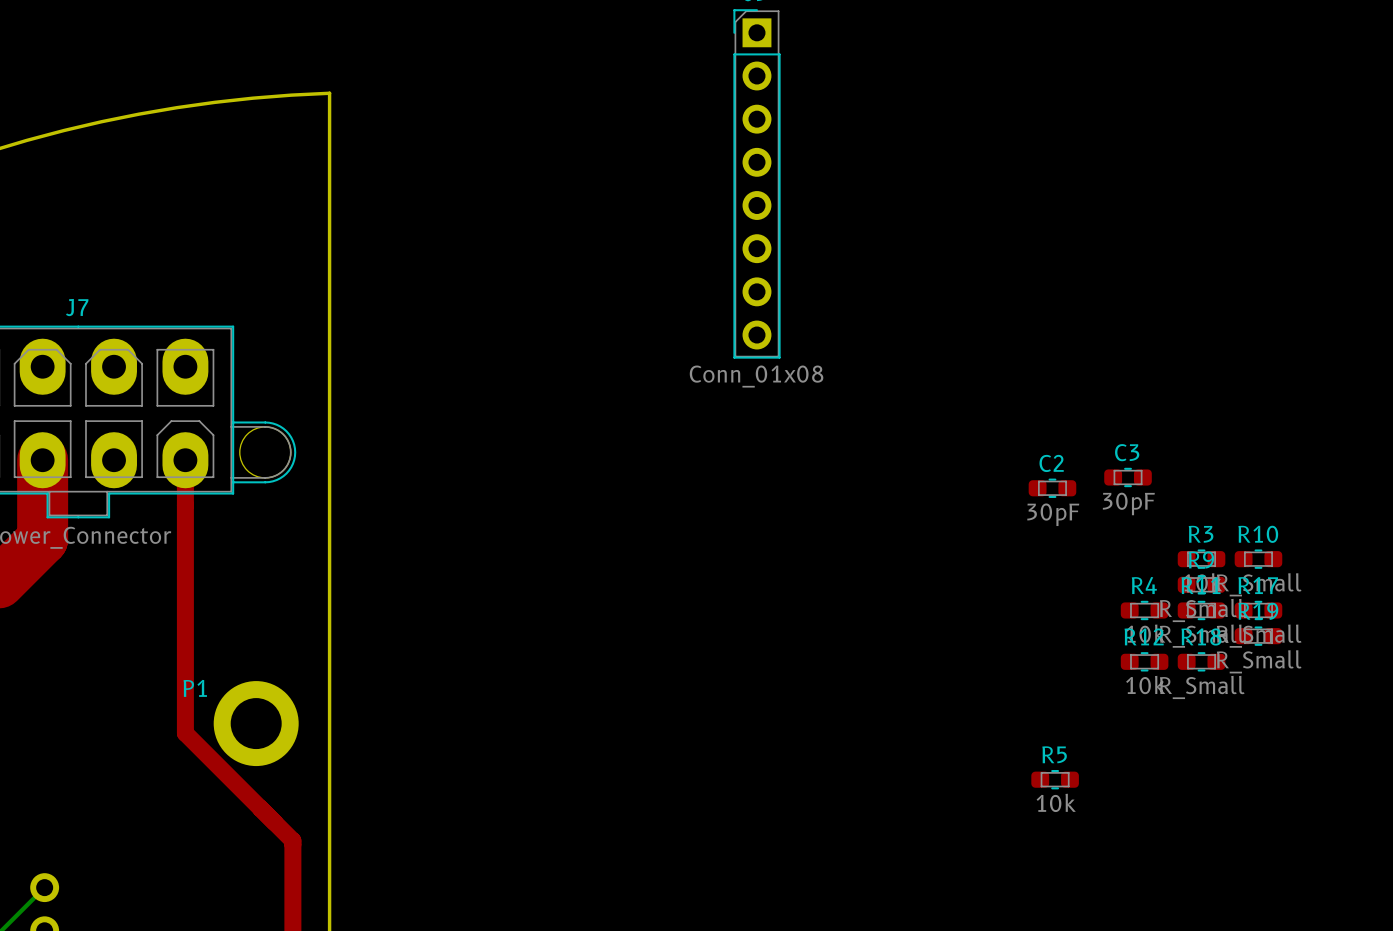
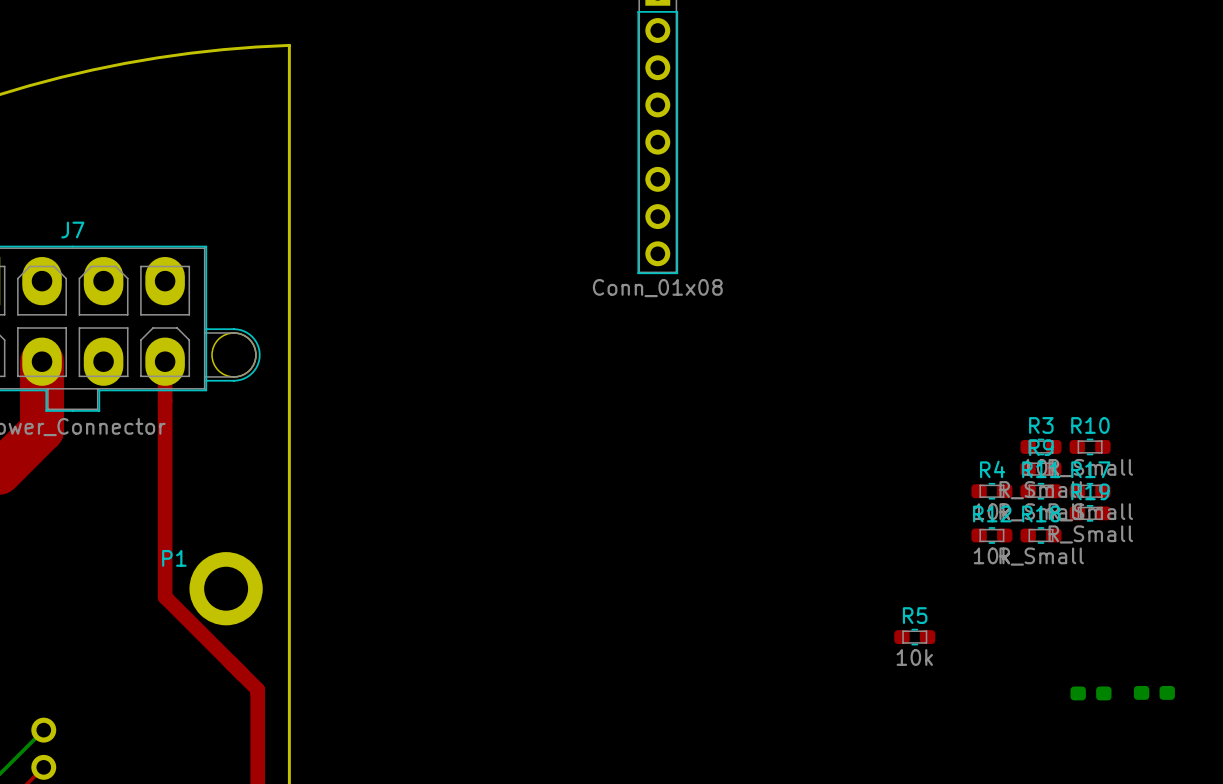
C3: 30pF (1128, 477) -> none
C2: 30pF (1052, 488) -> none
part: none -> (1154, 692)
part: none -> (1091, 693)

